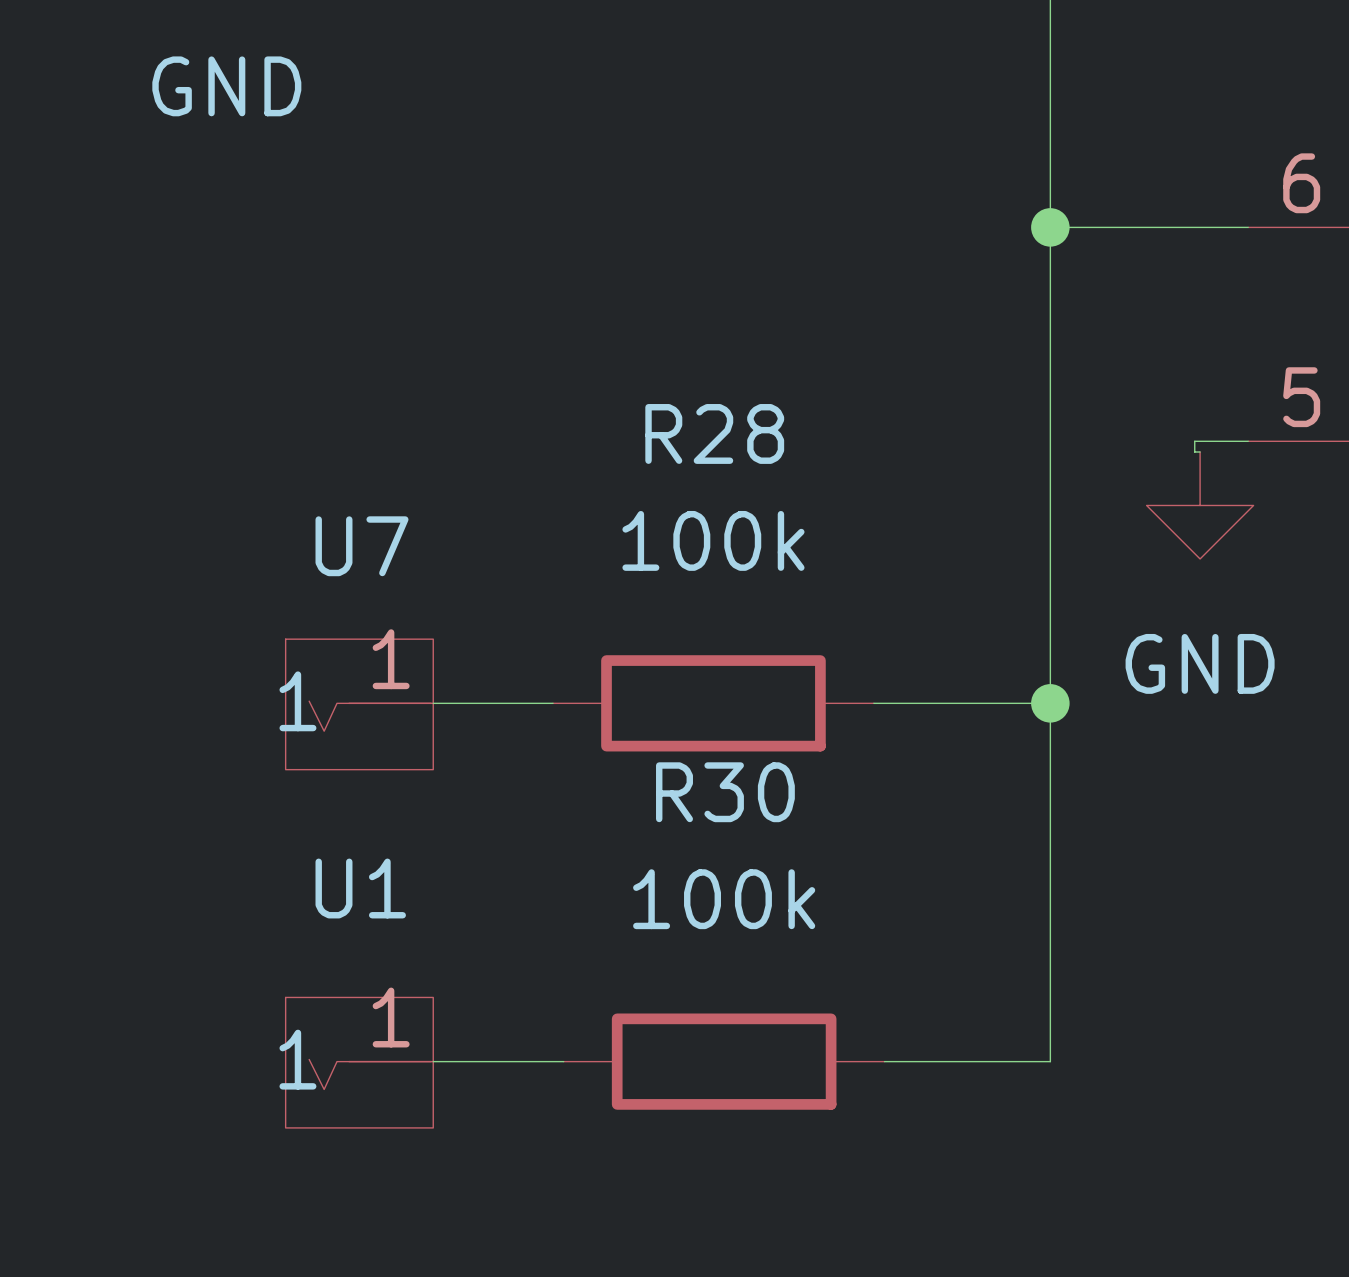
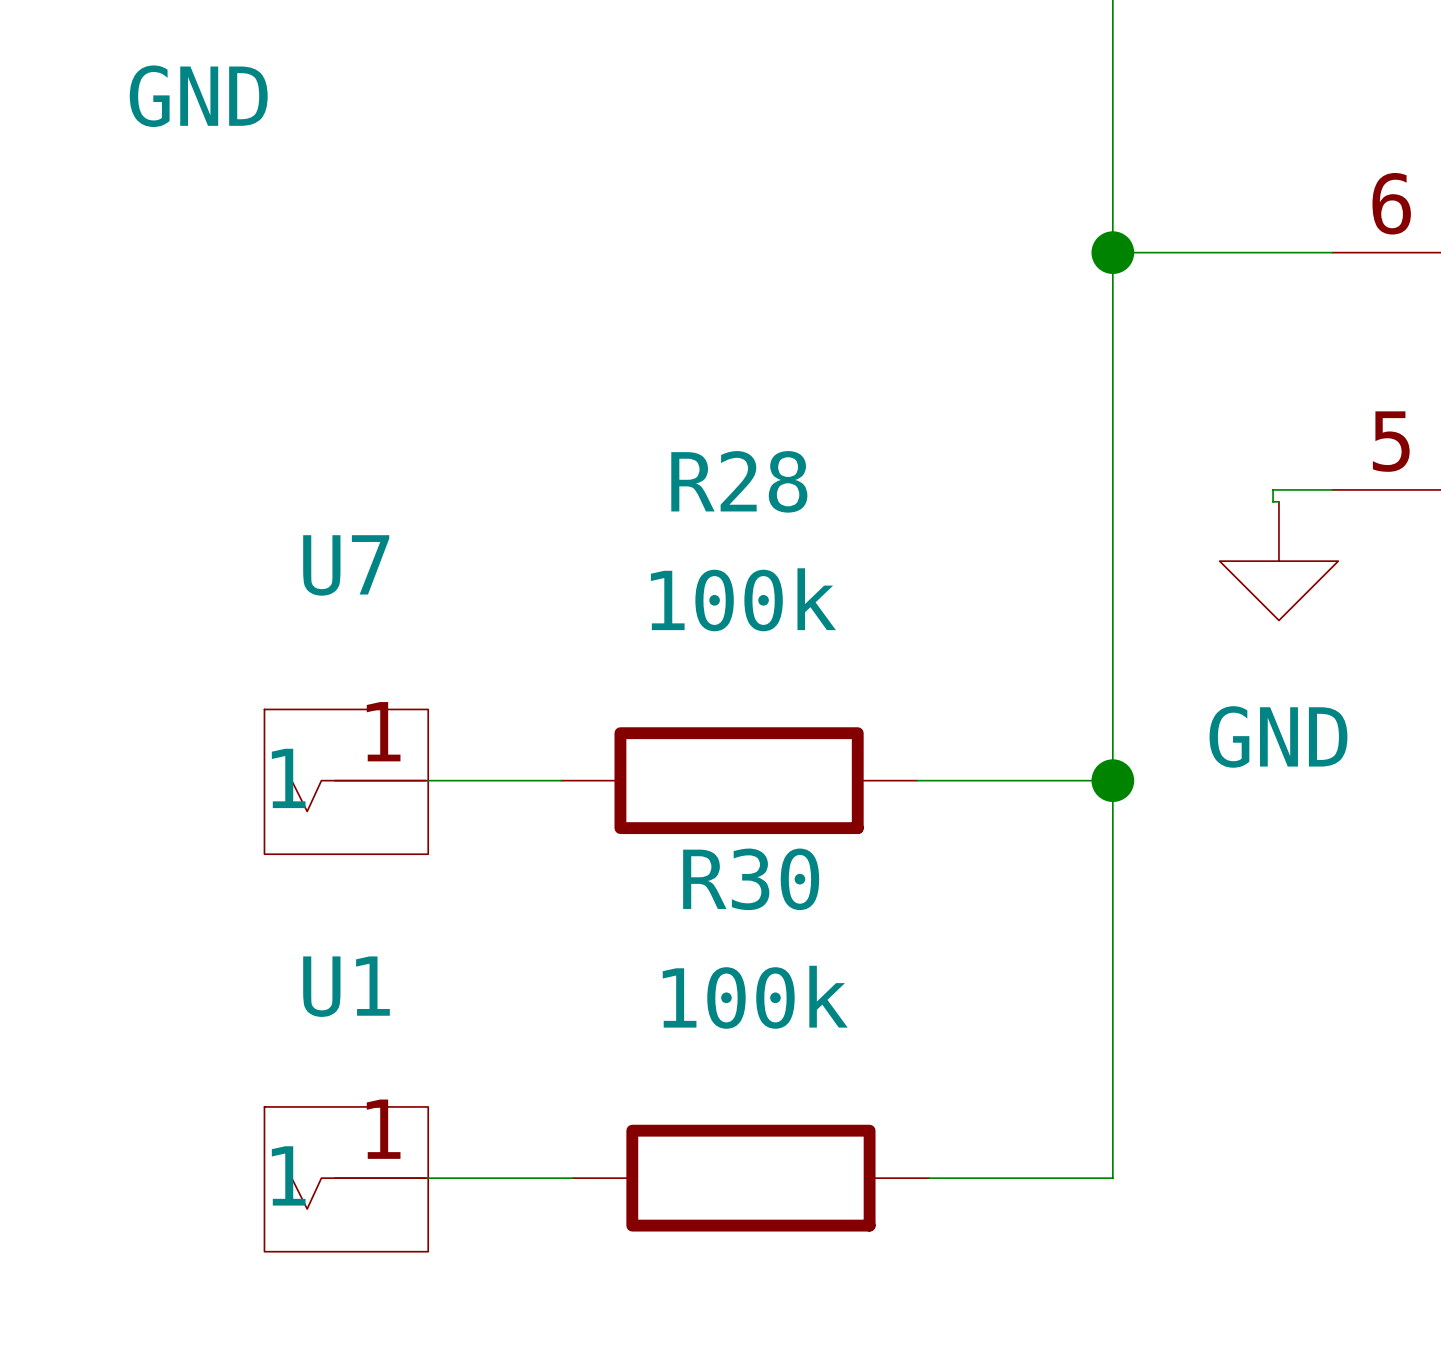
U7 name position: U7 (361, 546) -> U7 (346, 565)

